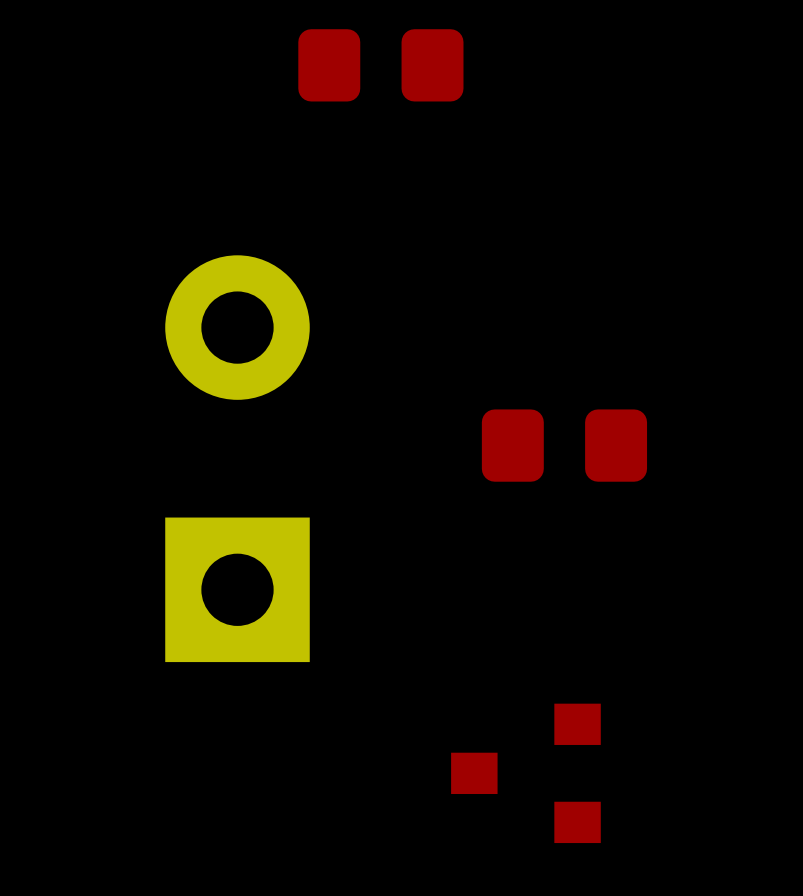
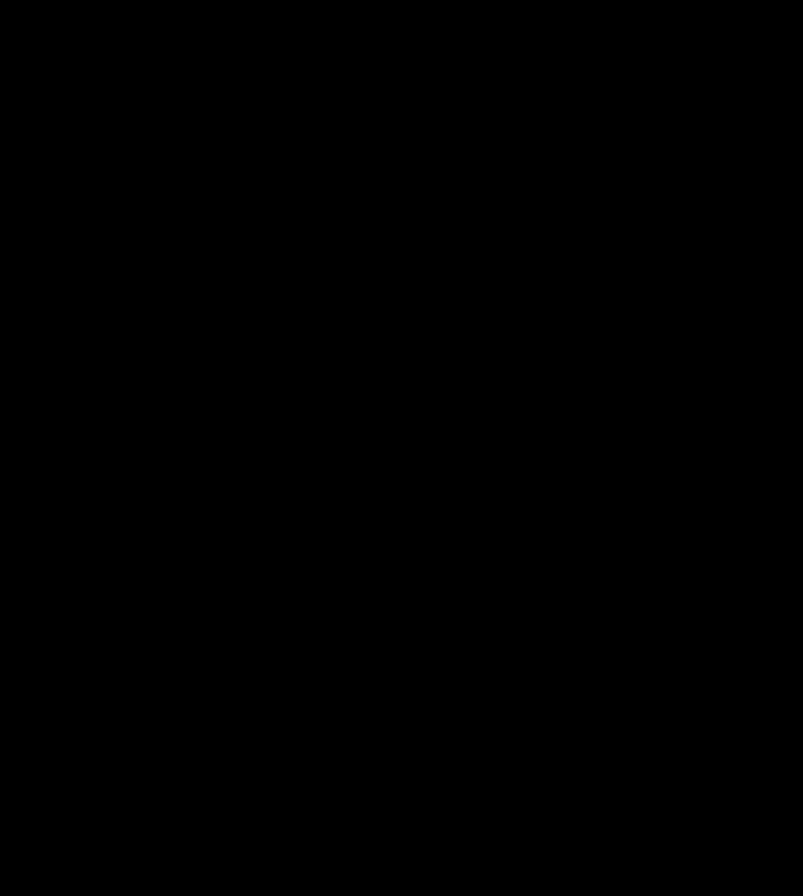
part: (380, 65) -> none
part: (564, 445) -> none
part: (237, 458) -> none
part: (525, 773) -> none

